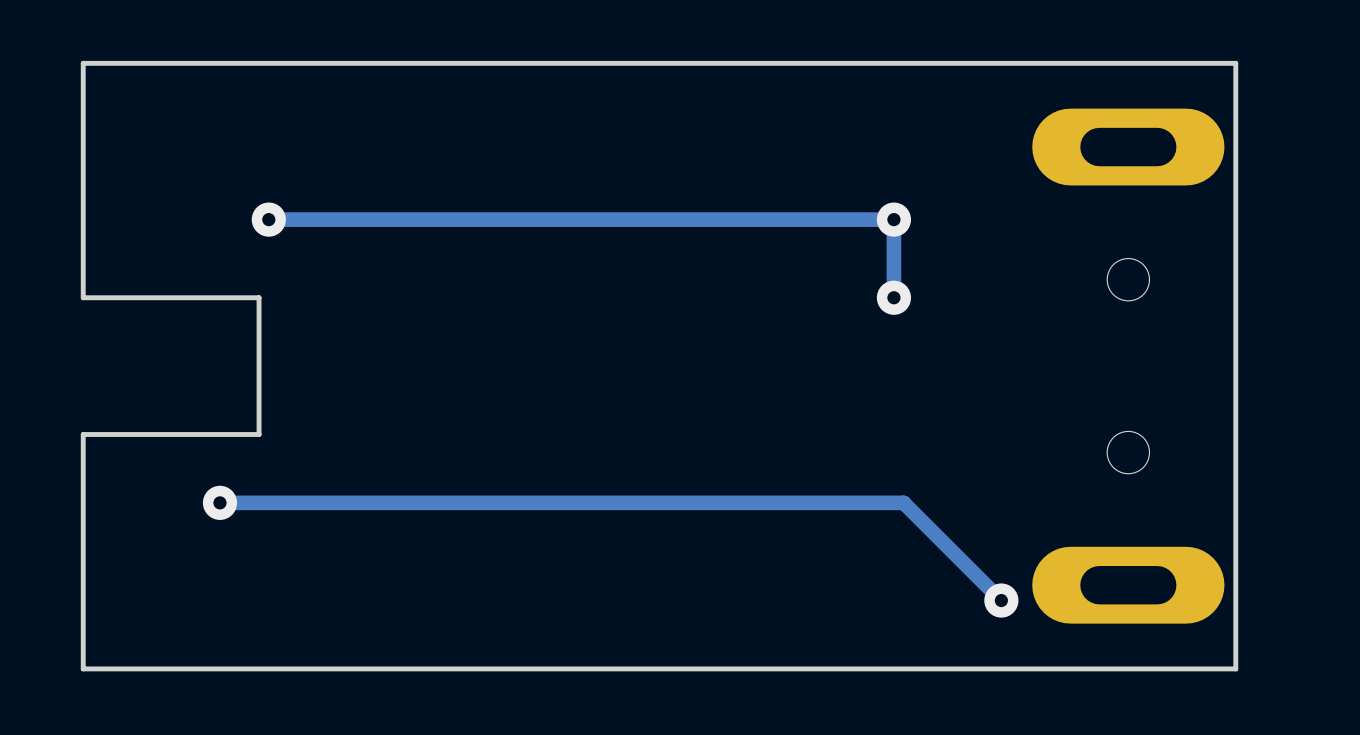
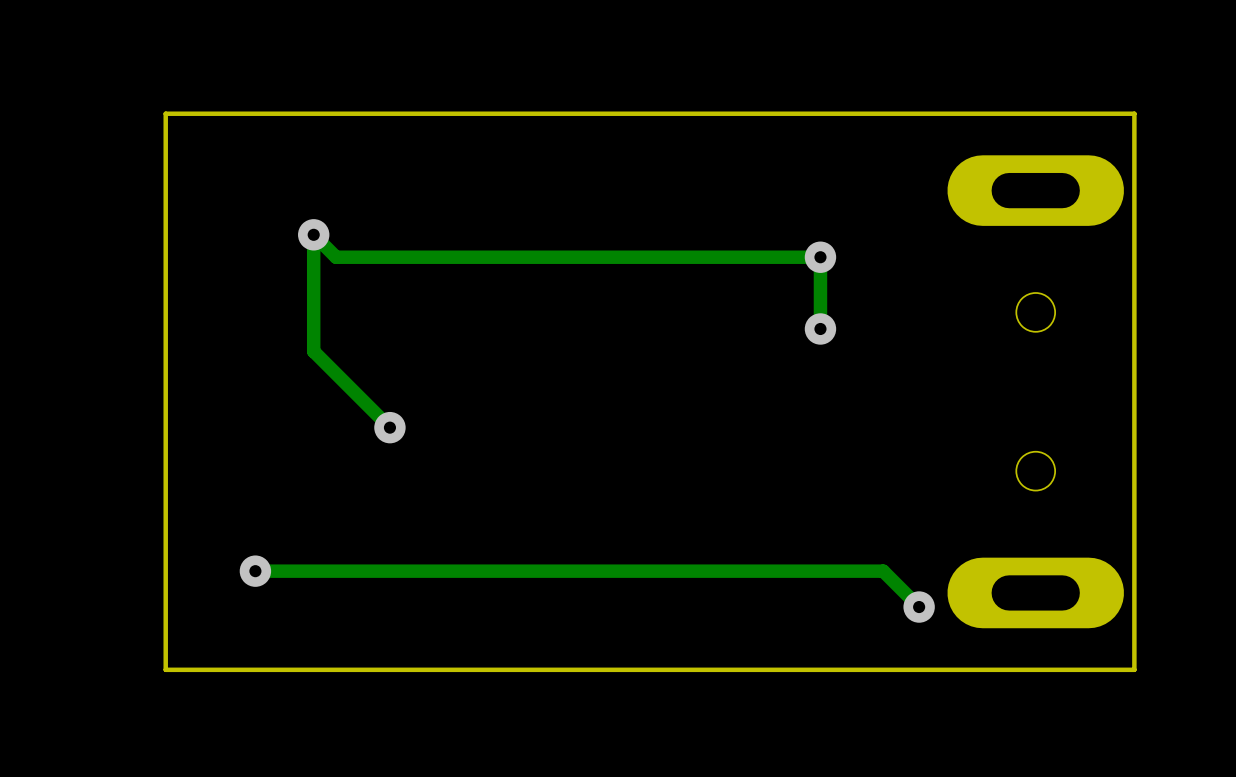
board edge: (180, 63) (83, 63) (83, 297) (259, 297) (259, 434) (83, 434) (83, 668) (180, 668) -> (165, 113) (165, 669)
via position: (268, 219) -> (313, 234)
track: (366, 219) (268, 219) -> (336, 257) (313, 234) (313, 351) (389, 427)
via: none -> (389, 427)
track: (219, 502) (903, 502) (962, 561) -> (255, 571) (883, 571)
via position: (219, 502) -> (255, 571)

